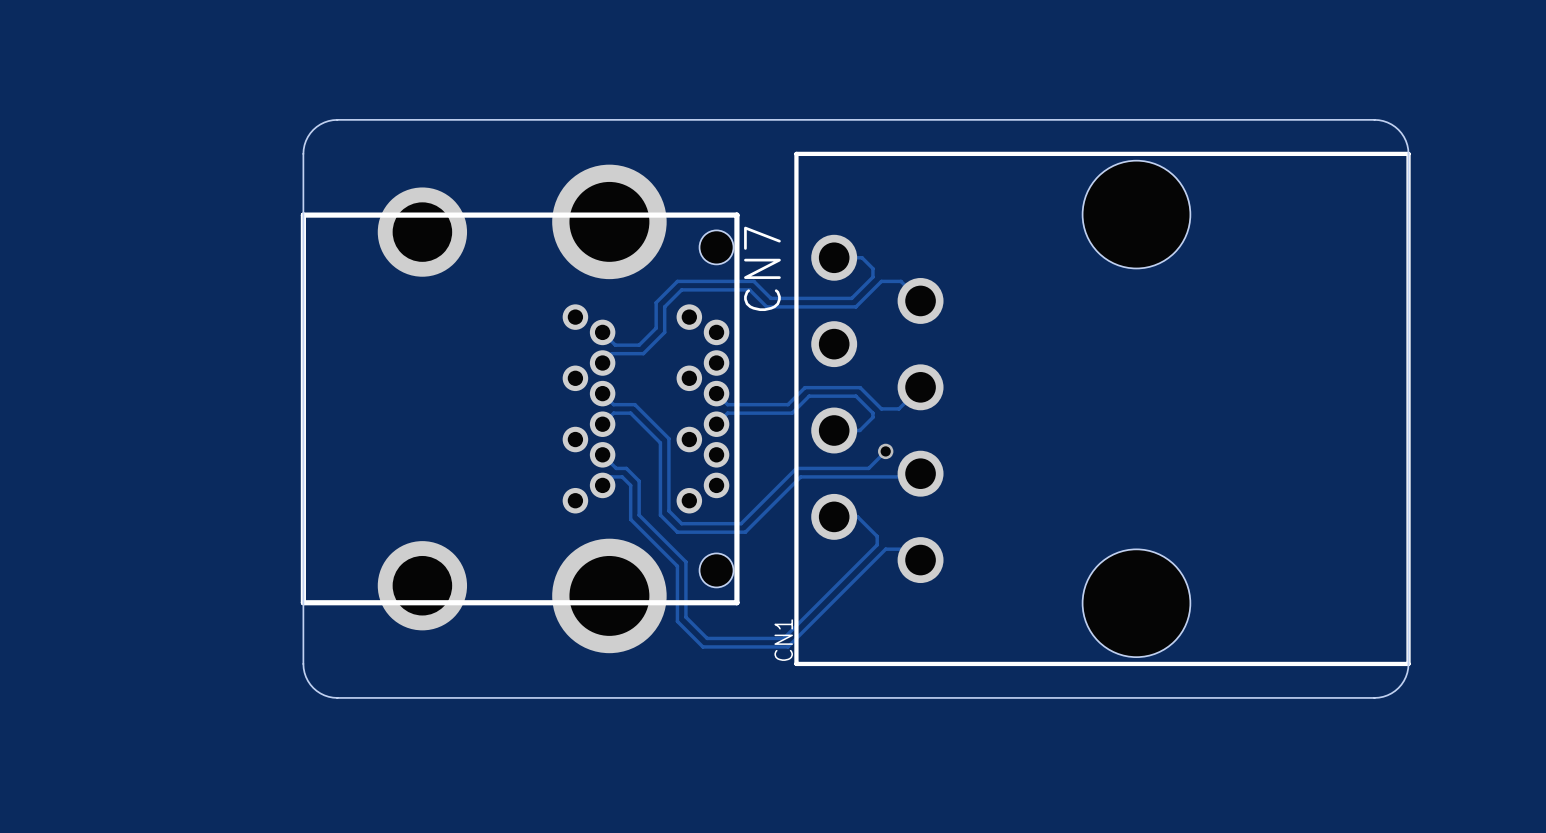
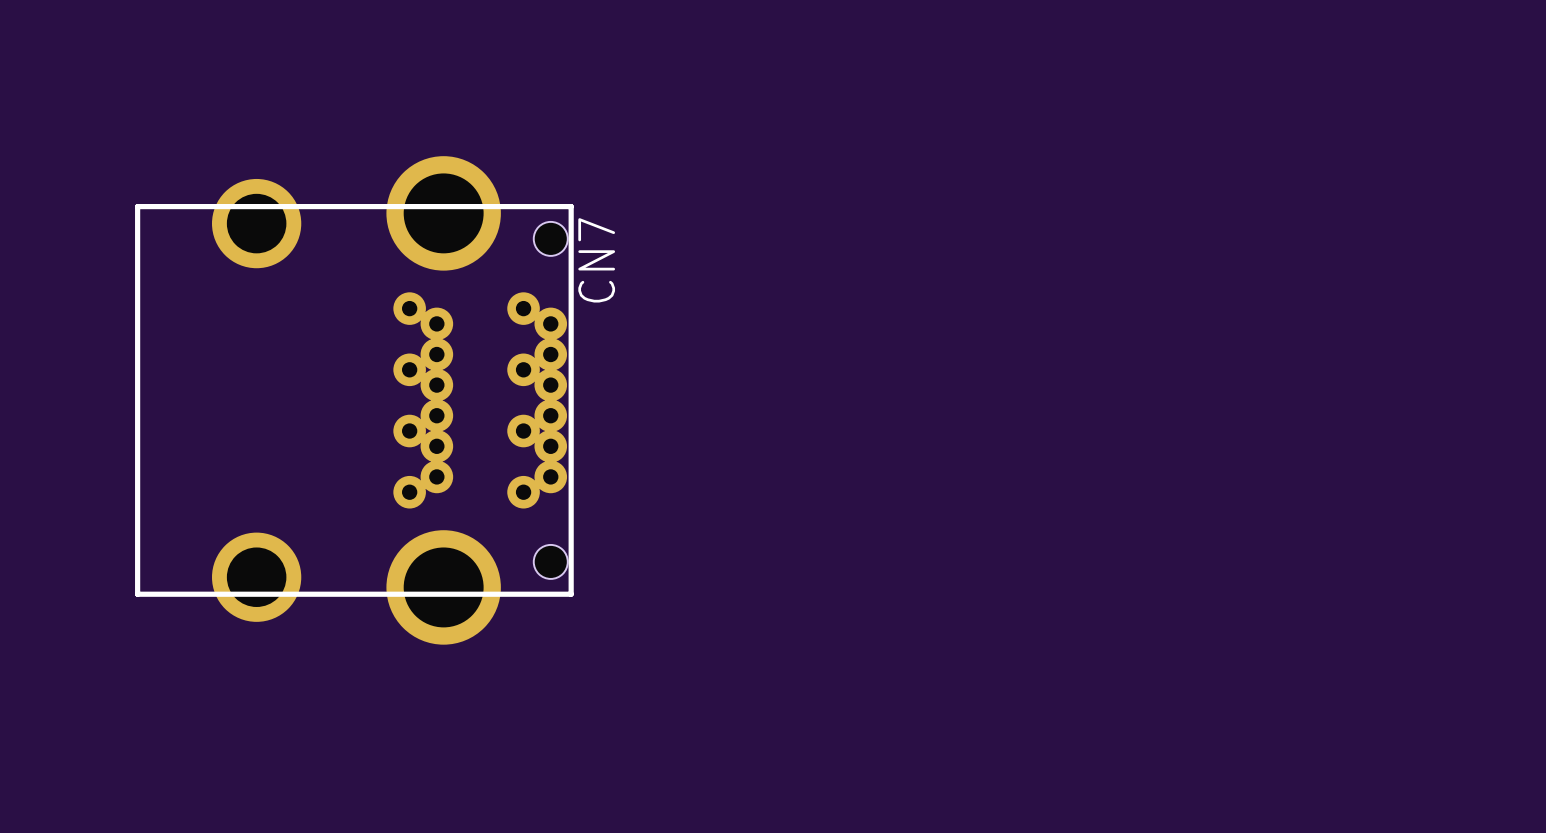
board edge: (337, 119) (1374, 119) (1391, 124) (1403, 136) (1408, 153) (1408, 663) (1403, 680) (1391, 693) (1374, 697) (337, 697) (320, 693) (307, 680) (303, 663) (303, 153) (305, 140) (313, 129) (324, 122) (337, 119) -> none
CN7 footprint: [300, 164, 740, 654] -> [135, 156, 574, 645]
track: (834, 257) (862, 257) (872, 268) (872, 277) (851, 298) (770, 298) (753, 281) (677, 281) (656, 302) (656, 328) (639, 345) (615, 345) (602, 332) -> none
track: (920, 300) (901, 281) (881, 281) (855, 306) (766, 306) (749, 289) (681, 289) (664, 306) (664, 332) (643, 353) (611, 353) (602, 363) -> none
track: (920, 387) (898, 408) (881, 408) (860, 387) (804, 387) (787, 404) (727, 404) (716, 393) -> none
track: (602, 393) (613, 404) (634, 404) (668, 438) (668, 510) (681, 523) (741, 523) (796, 468) (868, 468) (885, 451) -> none
CN1: (1102, 408) -> none
track: (602, 424) (613, 413) (630, 413) (660, 442) (660, 515) (677, 532) (745, 532) (800, 476) (917, 476) (920, 473) -> none
track: (716, 424) (727, 413) (792, 413) (809, 396) (855, 396) (872, 413) (872, 417) (859, 430) (834, 430) -> none
via: (885, 451) -> none
track: (602, 454) (616, 468) (626, 468) (639, 481) (639, 515) (685, 561) (685, 617) (707, 638) (783, 638) (877, 544) (877, 536) (857, 516) (834, 516) -> none
track: (602, 485) (611, 476) (622, 476) (630, 485) (630, 519) (677, 566) (677, 621) (702, 646) (787, 646) (885, 549) (909, 549) (920, 560) -> none

